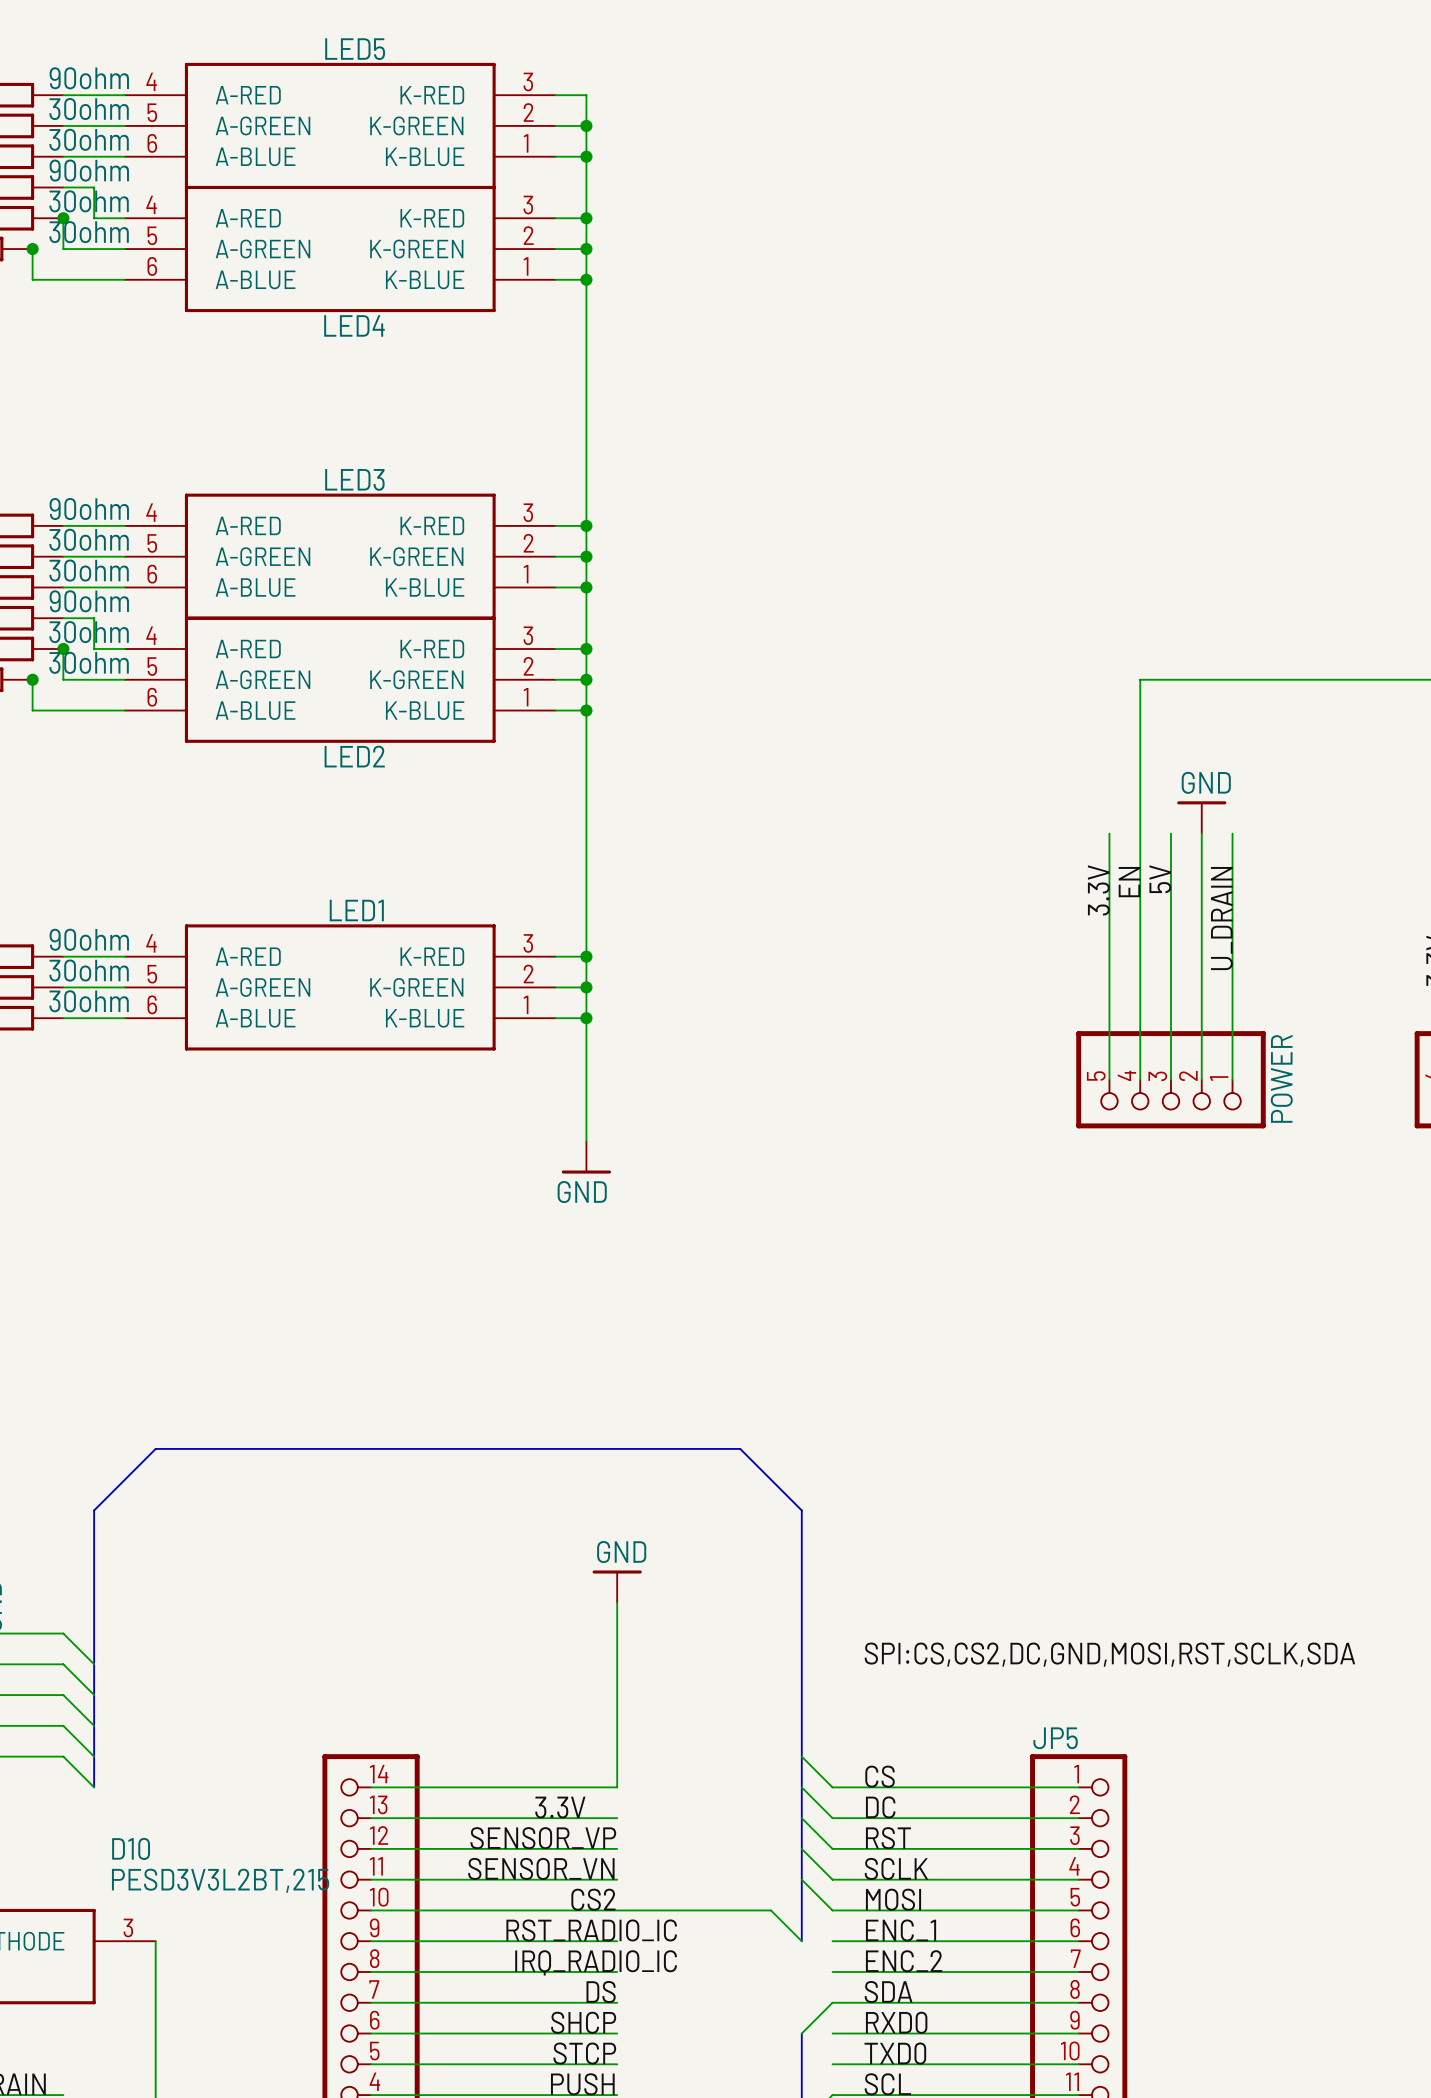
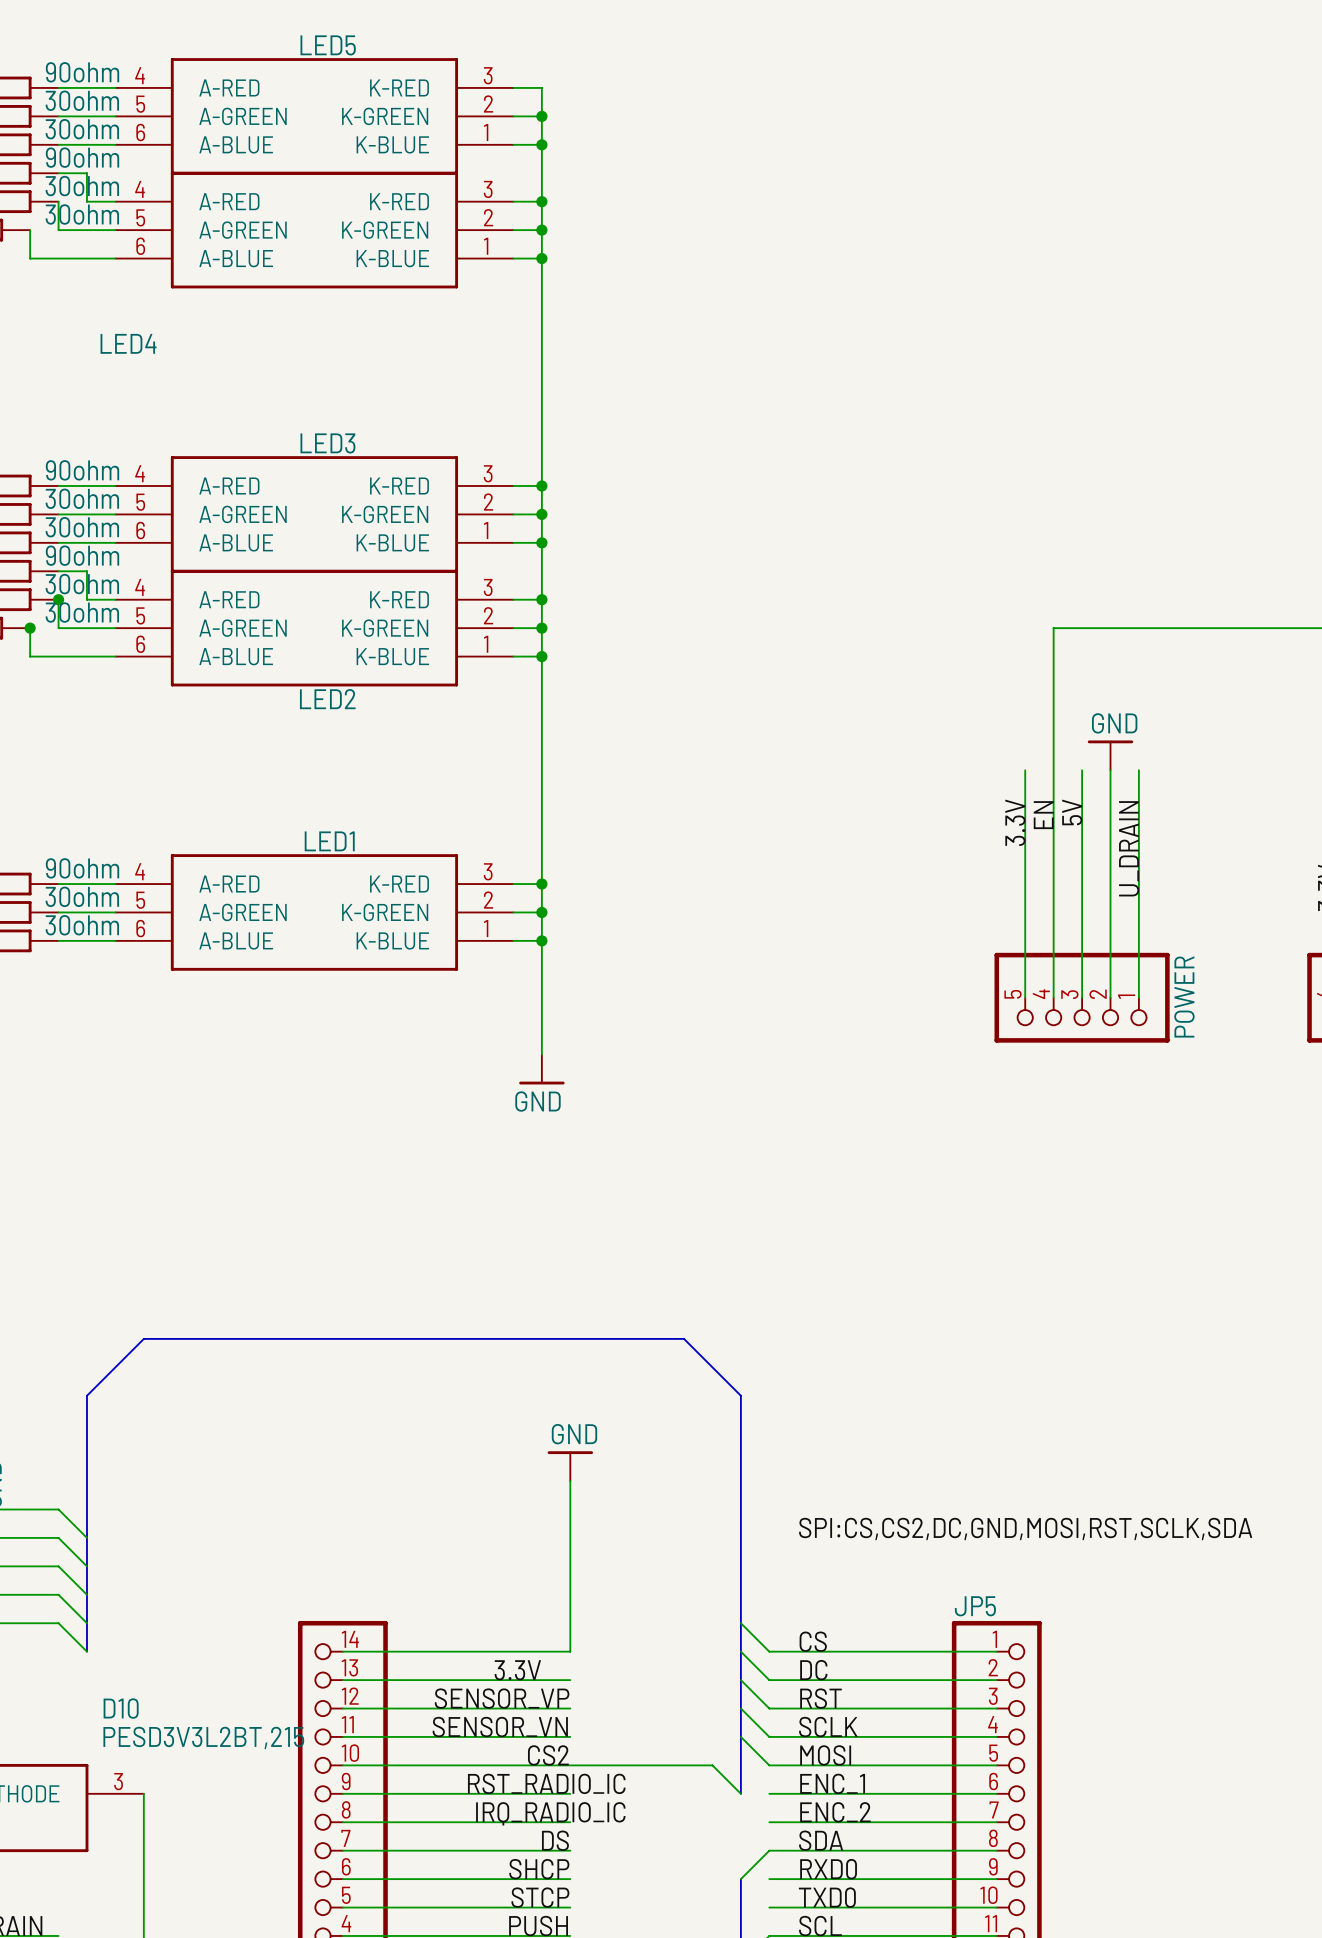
junction: (63, 218) -> none
junction: (32, 249) -> none
LED4 name position: LED4 (354, 325) -> LED4 (128, 343)

